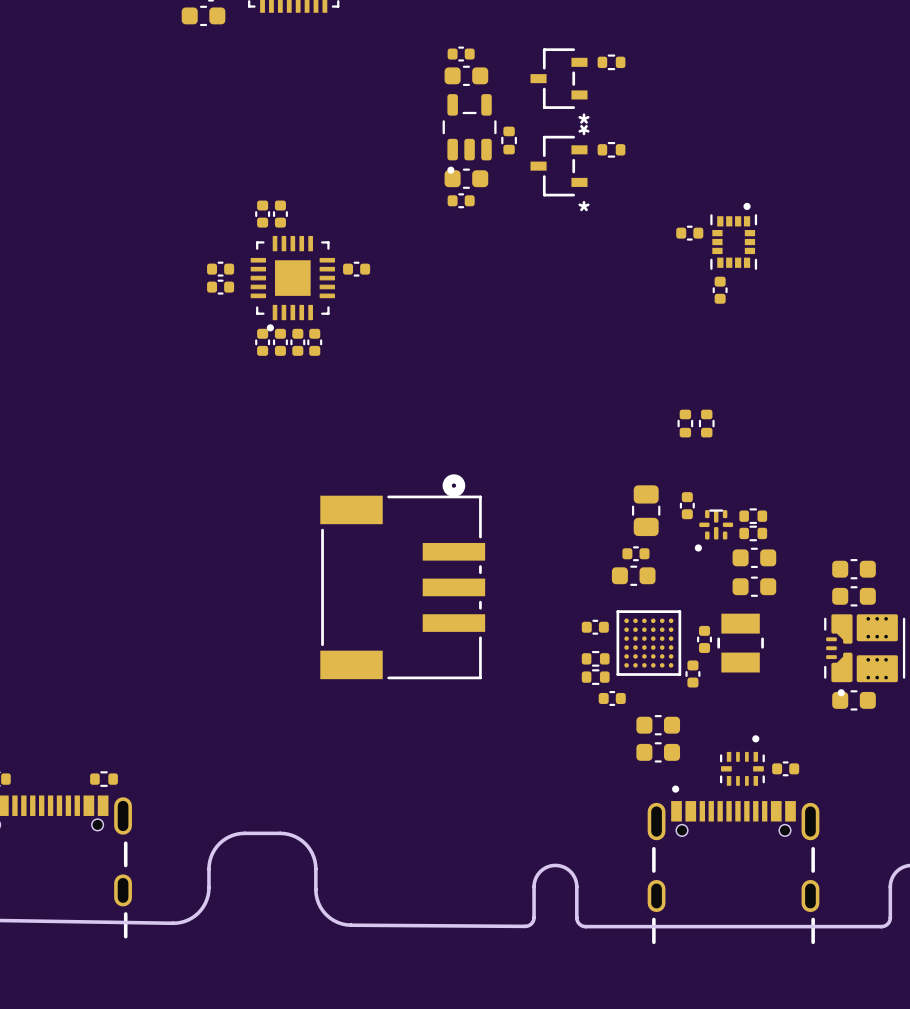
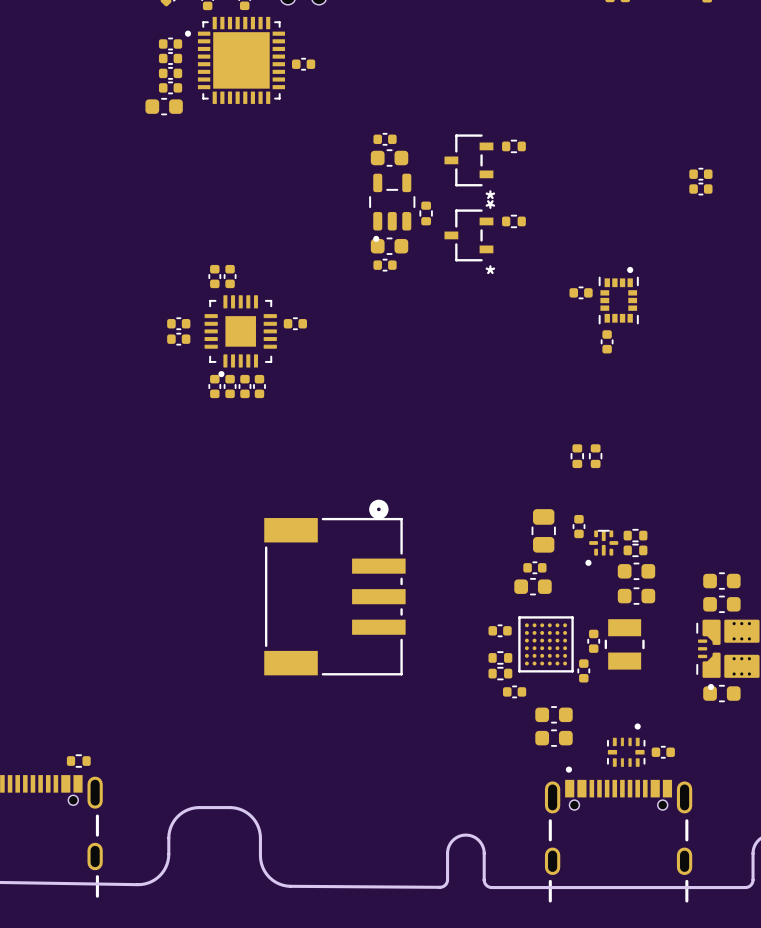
part: none -> (700, 174)
part: none -> (700, 189)

